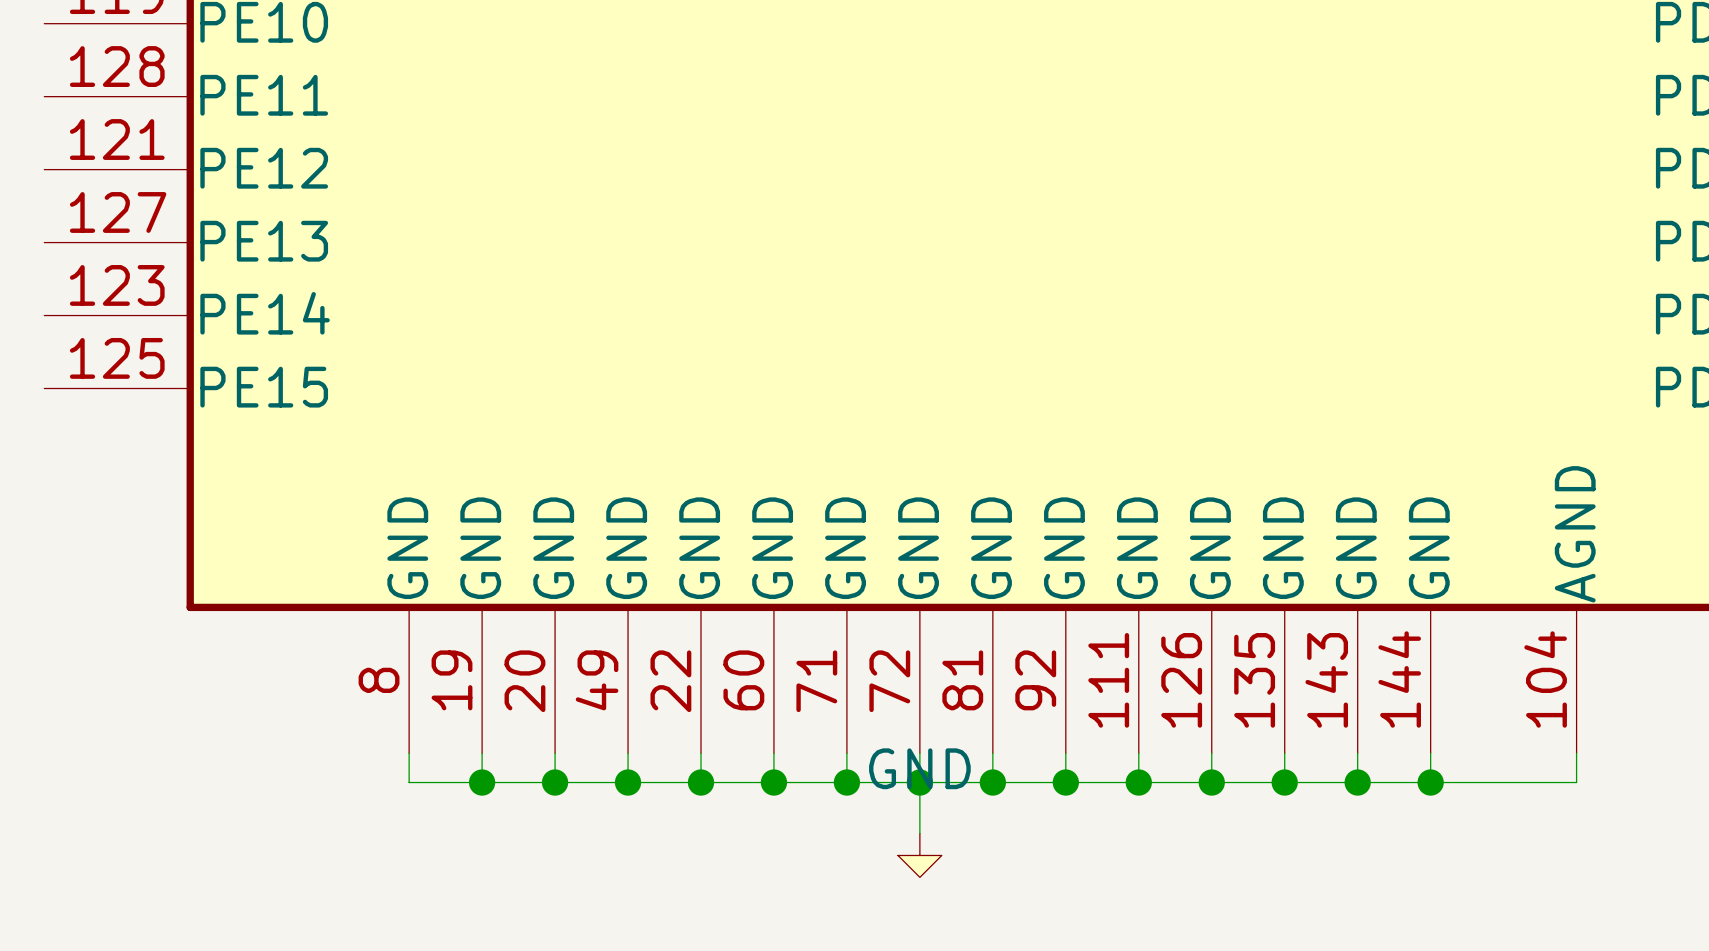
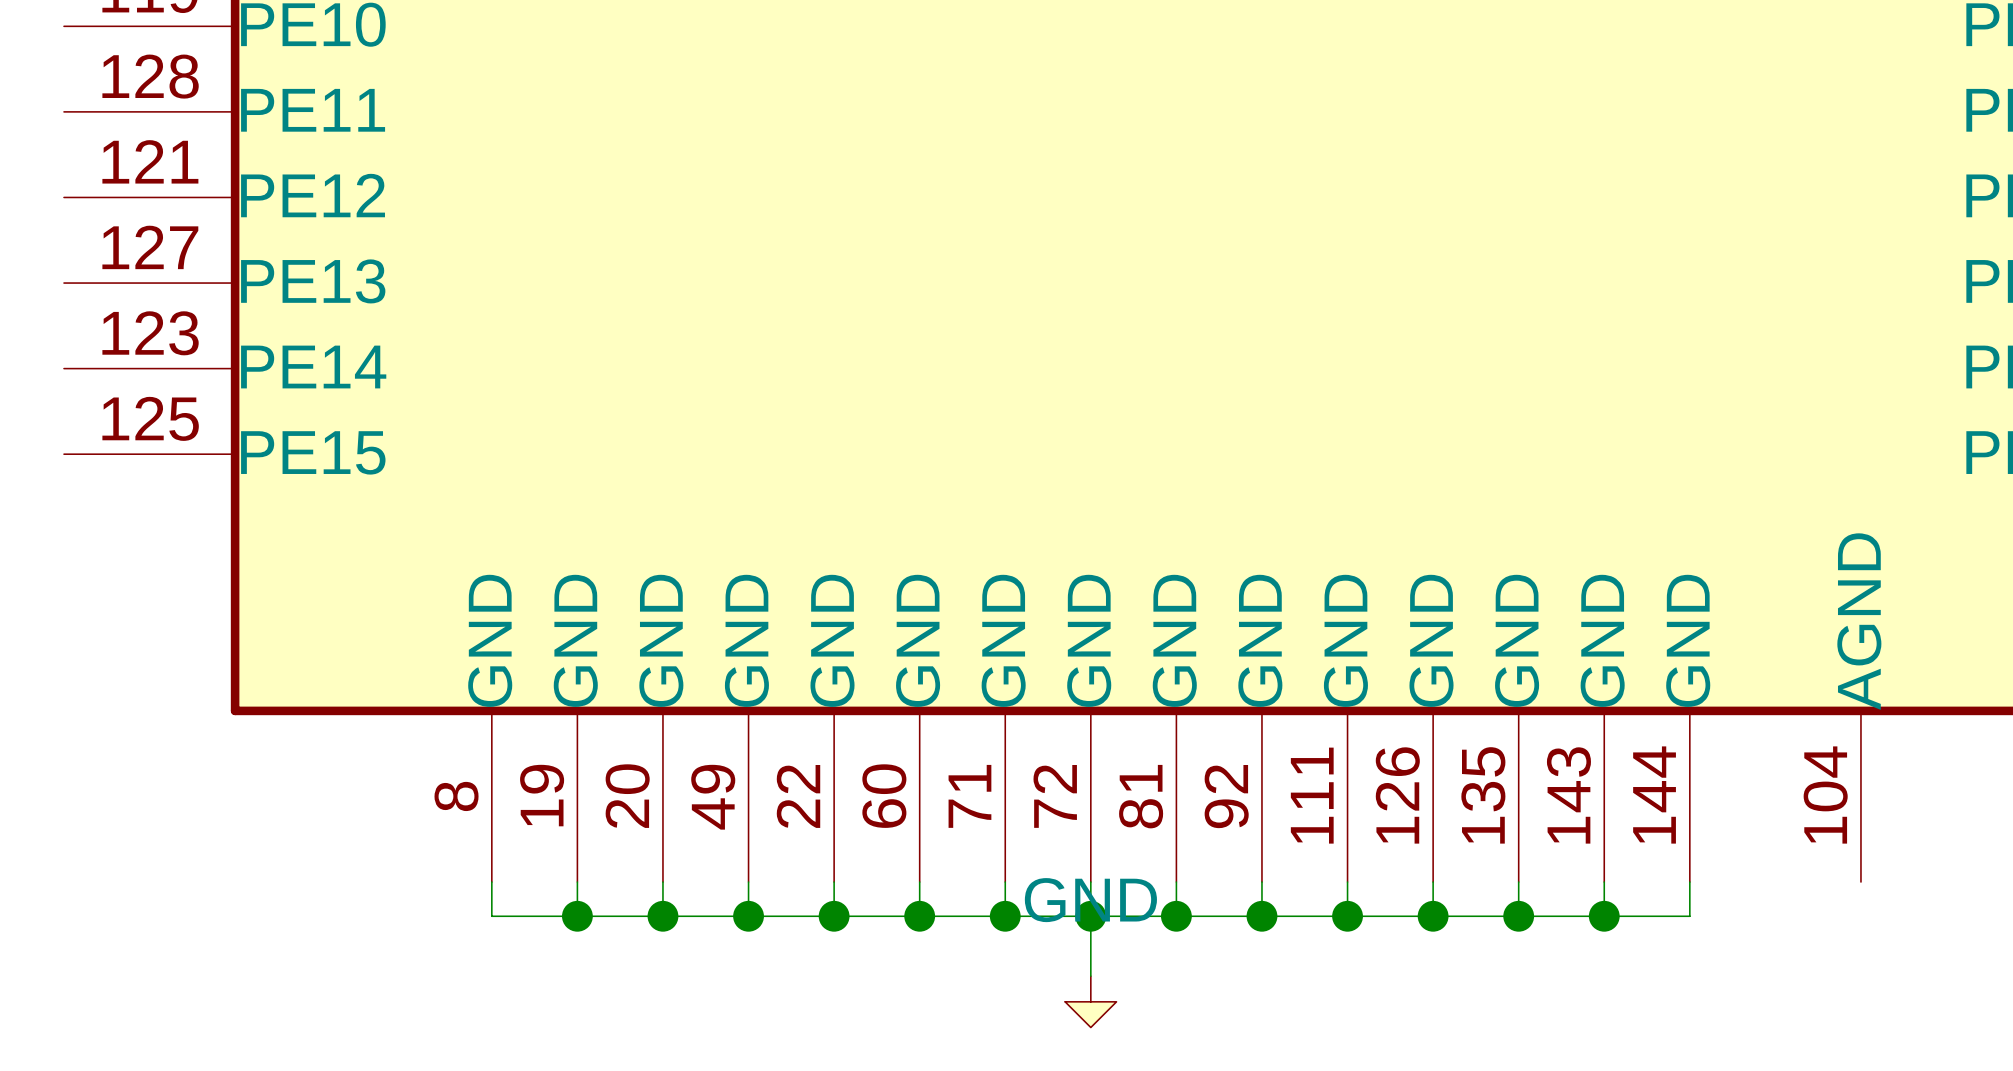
wire: (1576, 753) (1576, 782) (1430, 782) -> none
junction: (1430, 782) -> none

